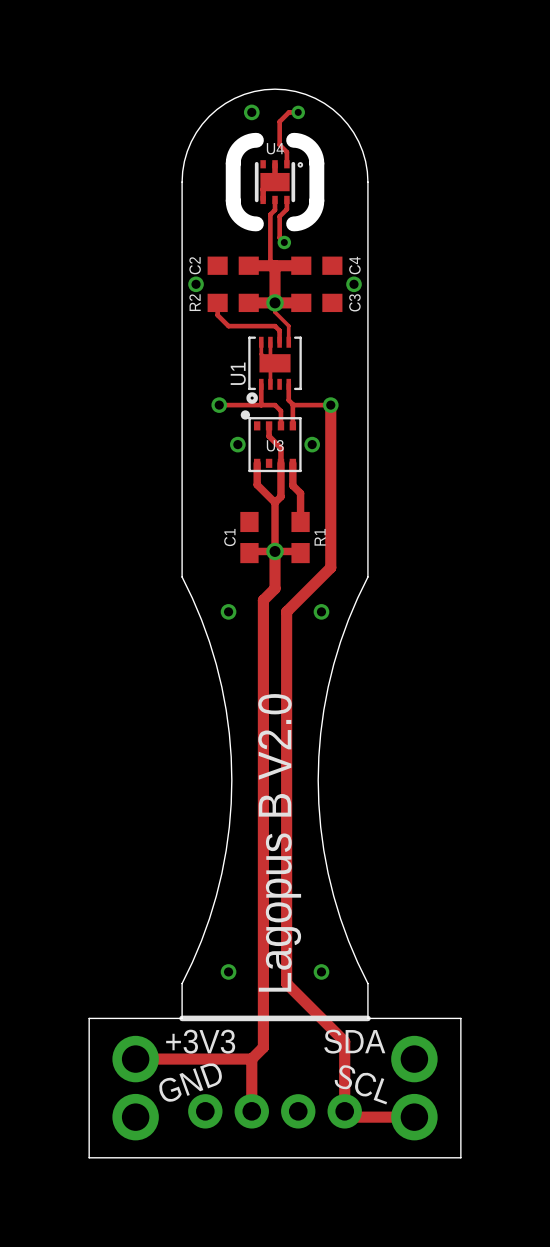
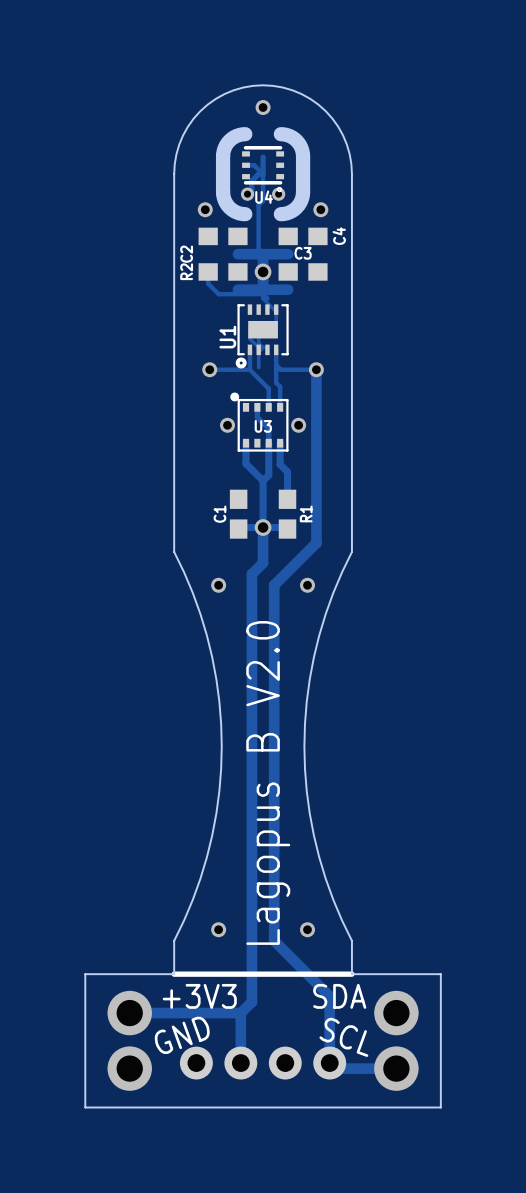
via position: (251, 112) -> (263, 107)
track: (298, 112) (288, 112) (279, 121) (279, 144) (286, 152) (286, 164) -> none
via: (298, 112) -> none
U4 name position: U4 (275, 148) -> U4 (264, 197)
U4 footprint: [254, 160, 304, 205] -> [242, 146, 285, 193]
track: none -> (246, 165) (254, 165) (263, 174) (263, 191)
track: (286, 199) (286, 209) (279, 216) (279, 237) (284, 242) -> none
via: none -> (247, 194)
via: none -> (278, 194)
via: none -> (205, 209)
via: none -> (320, 209)
via: (284, 242) -> none
C2 position: (233, 265) -> (223, 236)
C4 position: (316, 265) -> (303, 236)
via: (196, 284) -> none
track: none -> (208, 271) (208, 283) (218, 294) (263, 294) (267, 298)
via: (354, 284) -> none
track: (217, 302) (217, 315) (228, 326) (275, 326) (279, 330) (279, 342) -> none
R2 position: (233, 302) -> (223, 271)
via position: (275, 302) -> (263, 271)
C3 position: (316, 302) -> (303, 271)
C3 name rotation: 0° (354, 302) -> 90° clockwise (303, 253)
C3 name position: C3 (354, 302) -> C3 (303, 253)
U1 position: (274, 370) -> (262, 336)
track: (261, 386) (261, 405) -> (249, 349) (249, 367)
track: (219, 405) (275, 405) (280, 411) -> (209, 369) (249, 369) (268, 388) (268, 393)
via position: (219, 405) -> (209, 369)
track: (292, 405) (330, 405) -> (276, 349) (276, 365) (280, 369) (316, 369) (316, 387)
via position: (330, 405) -> (316, 369)

